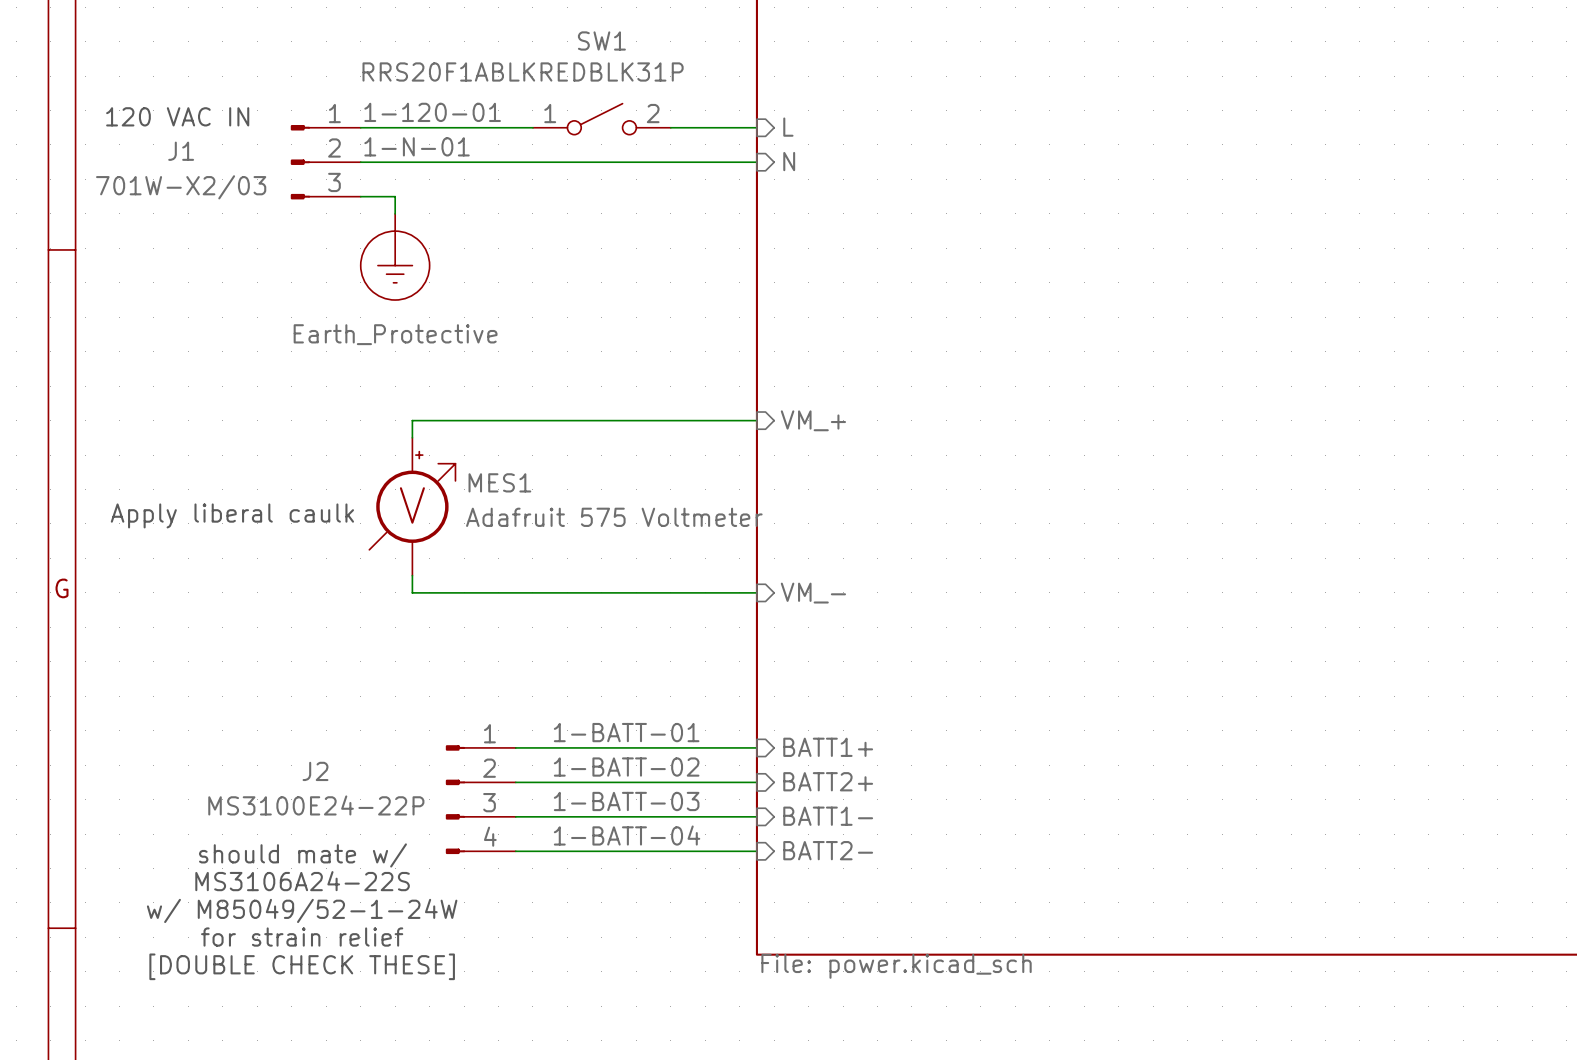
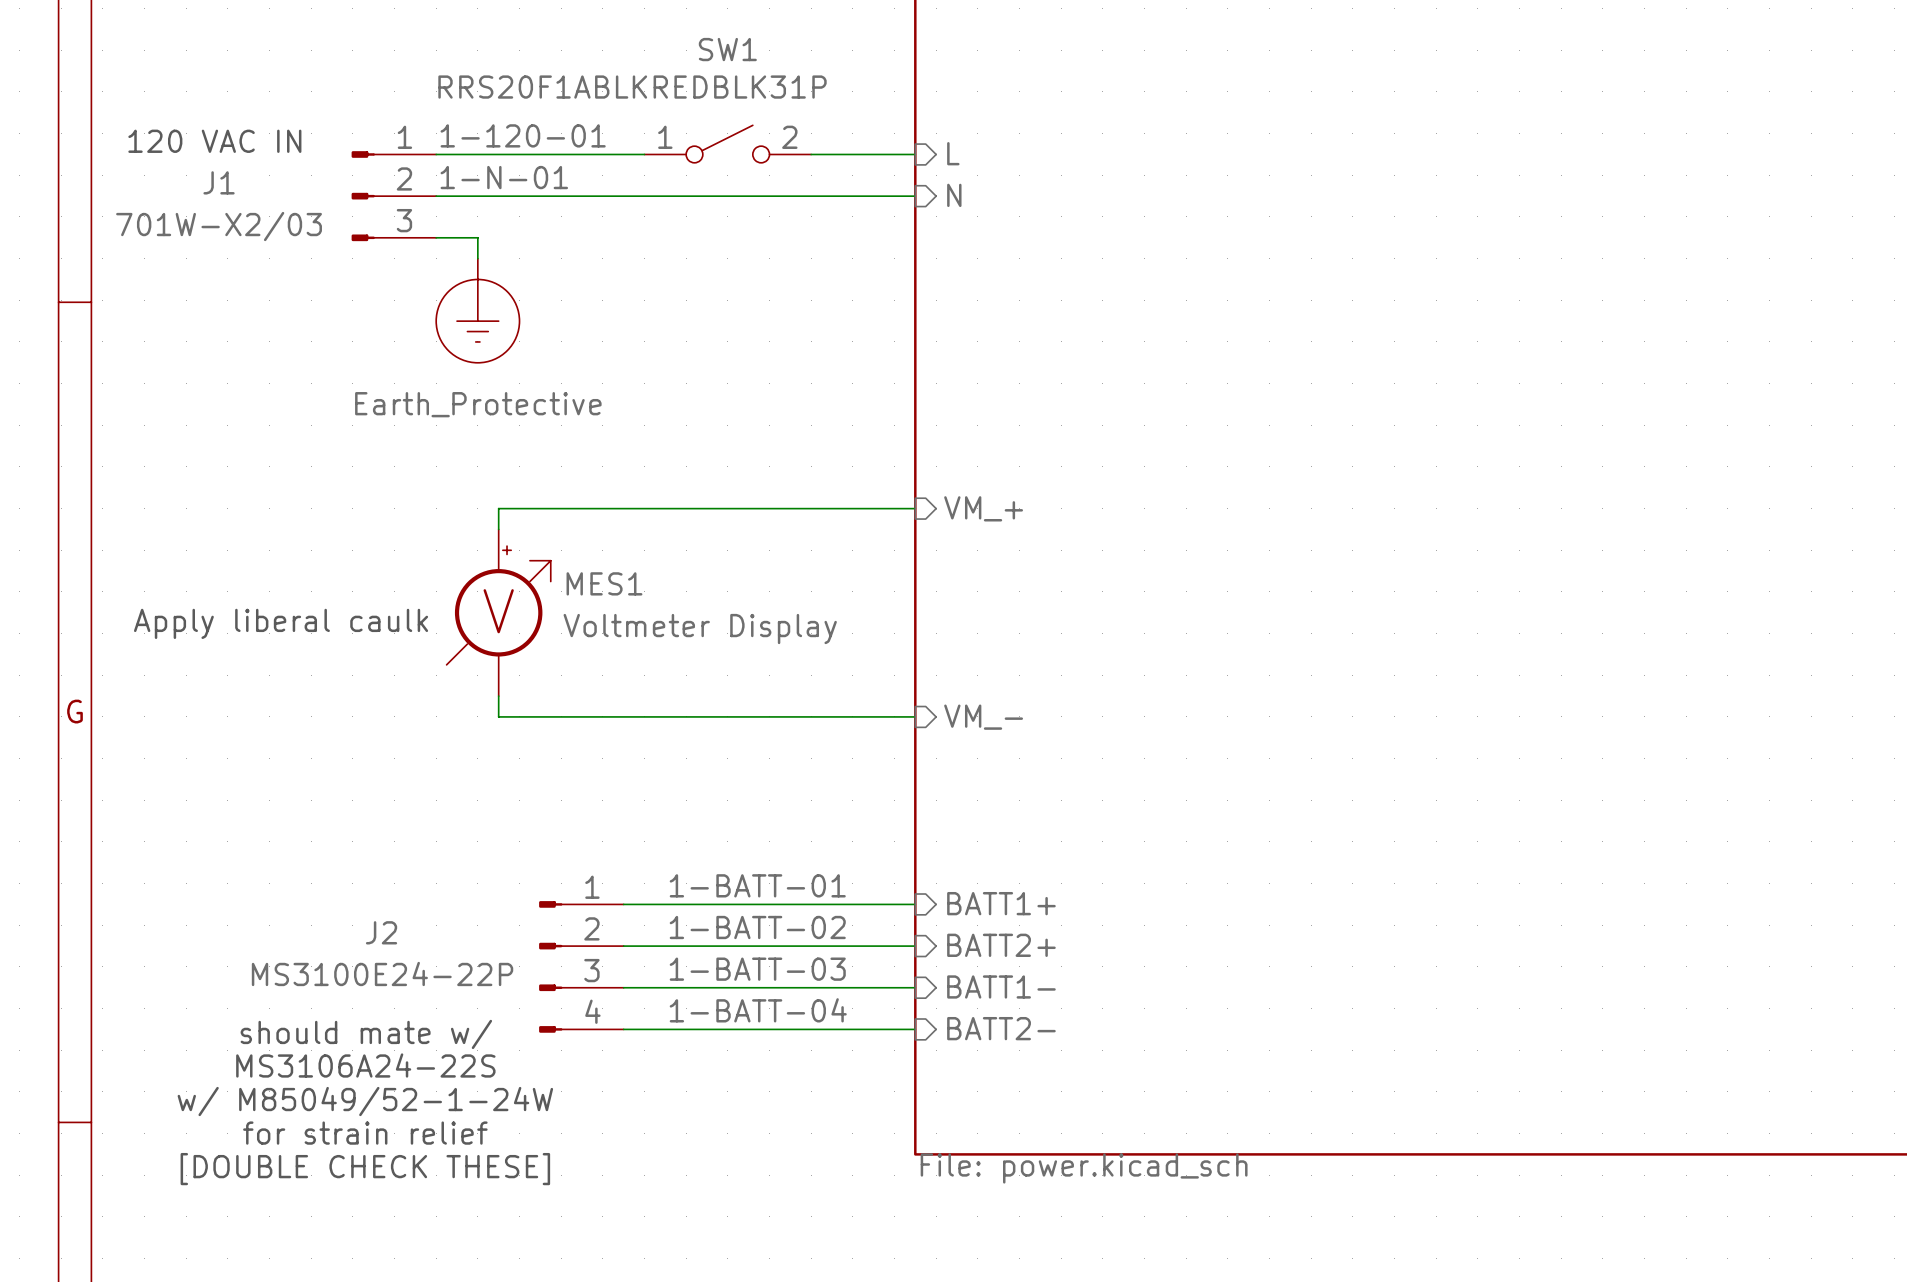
MES1 value: Adafruit 575 Voltmeter (614, 517) -> Voltmeter Display (700, 629)

